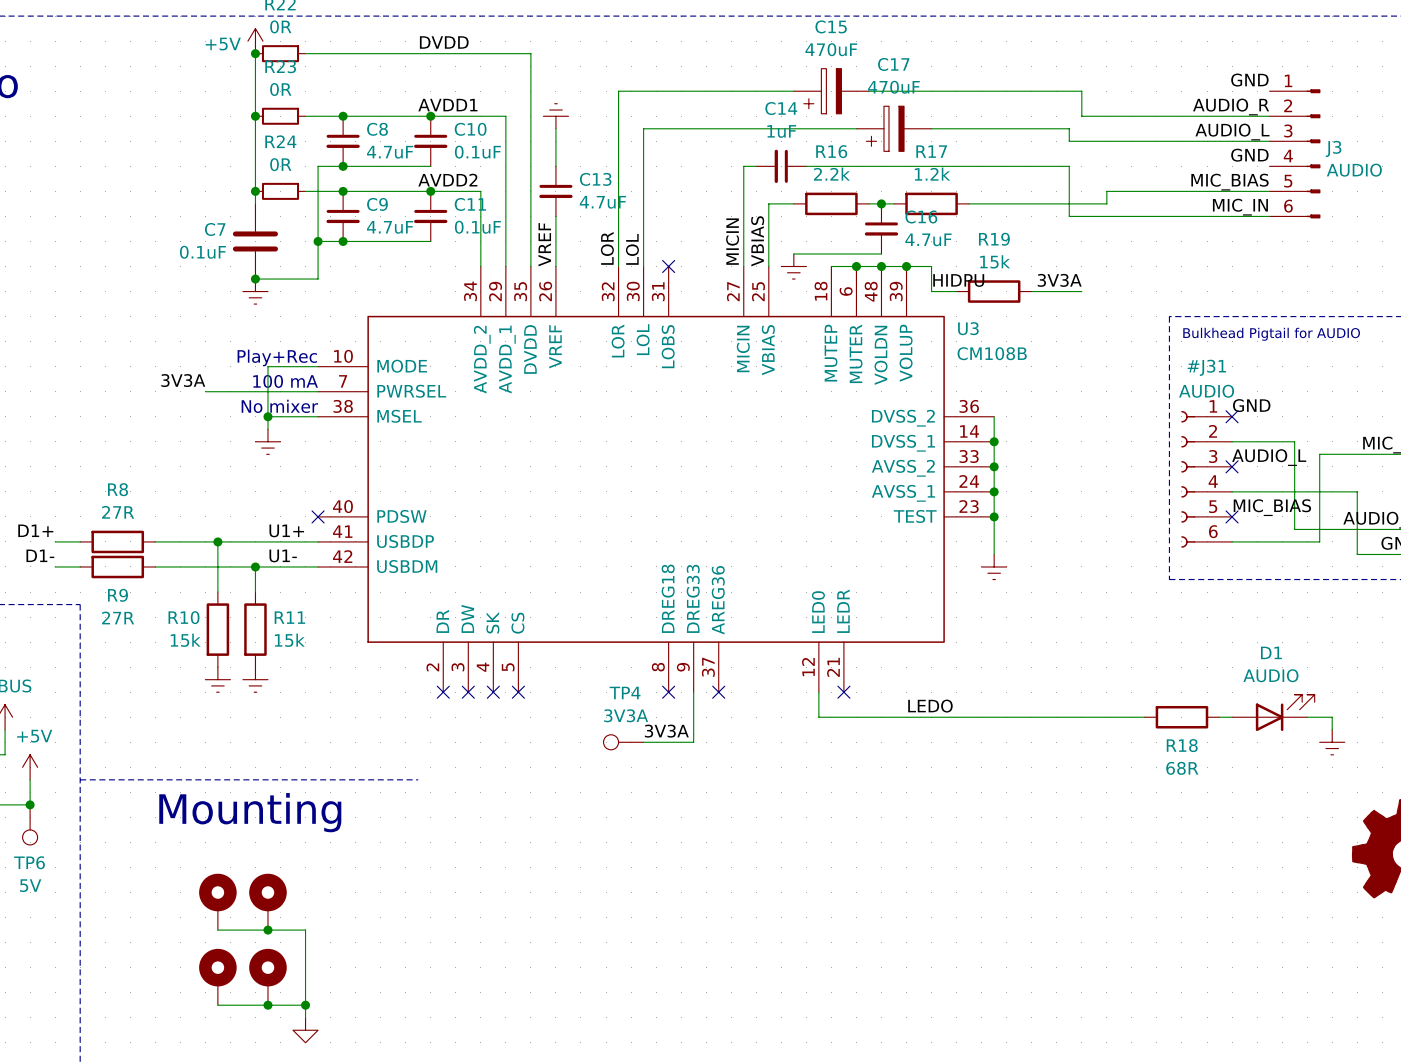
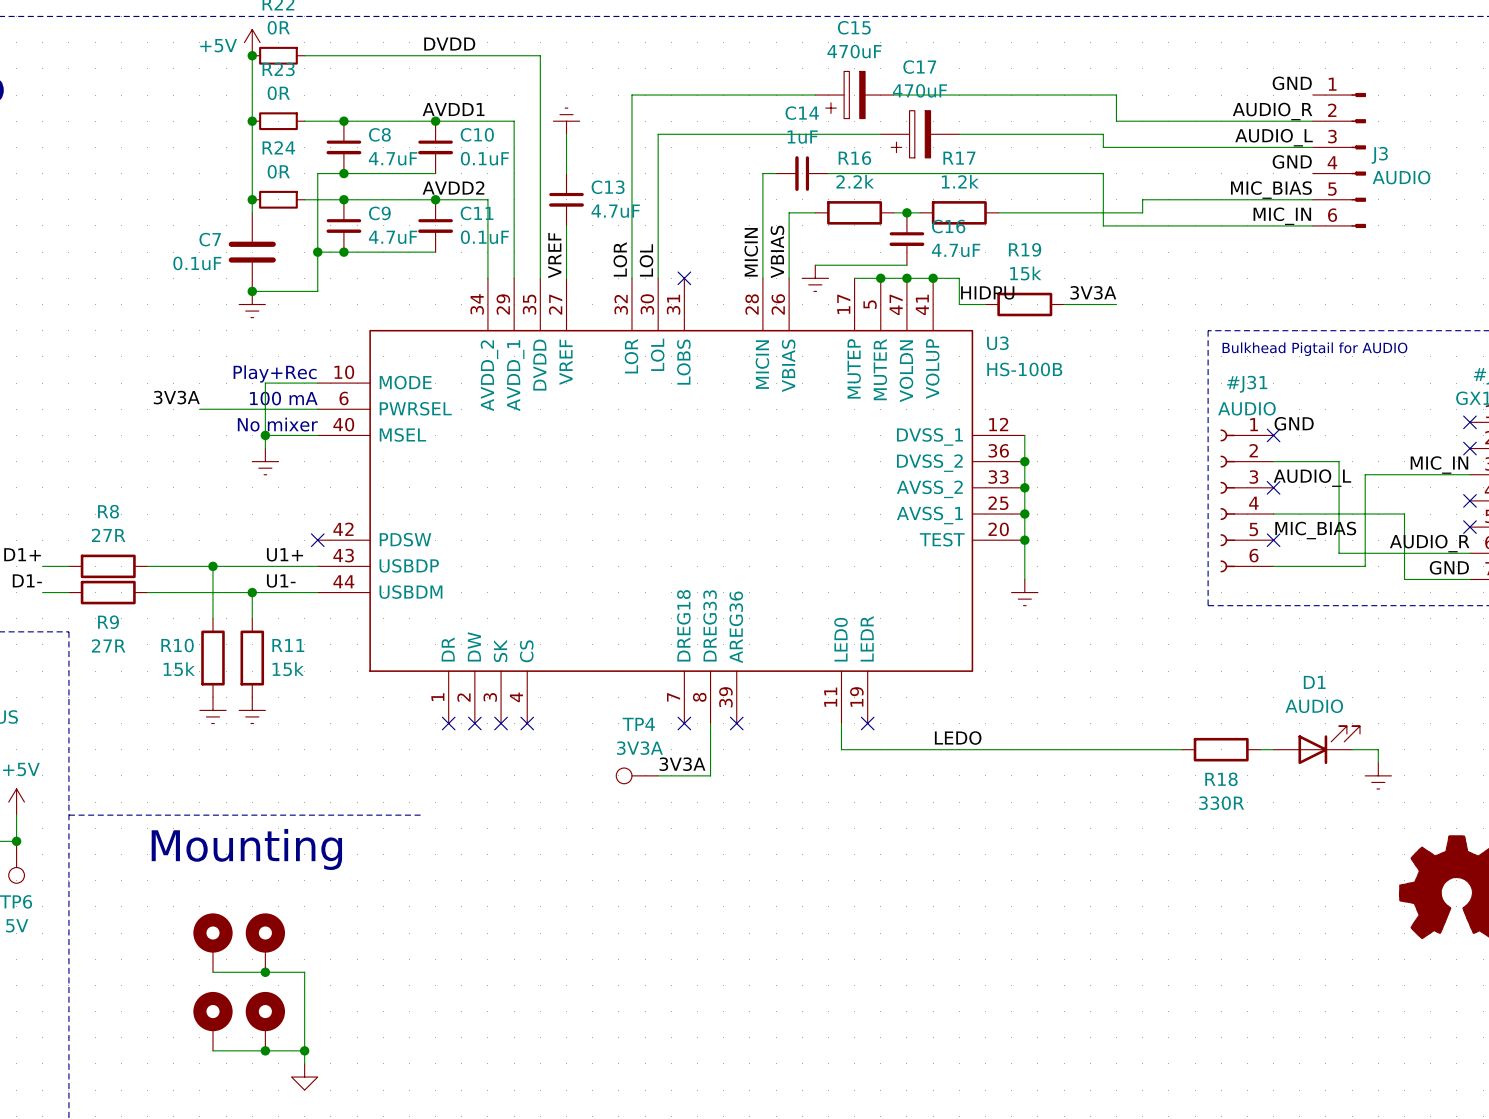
U3 symbol: [318, 266, 995, 693] -> [317, 278, 1025, 724]
U3 value: CM108B (992, 353) -> HS-100B (1024, 369)
R18 value: 68R (1182, 768) -> 330R (1221, 803)

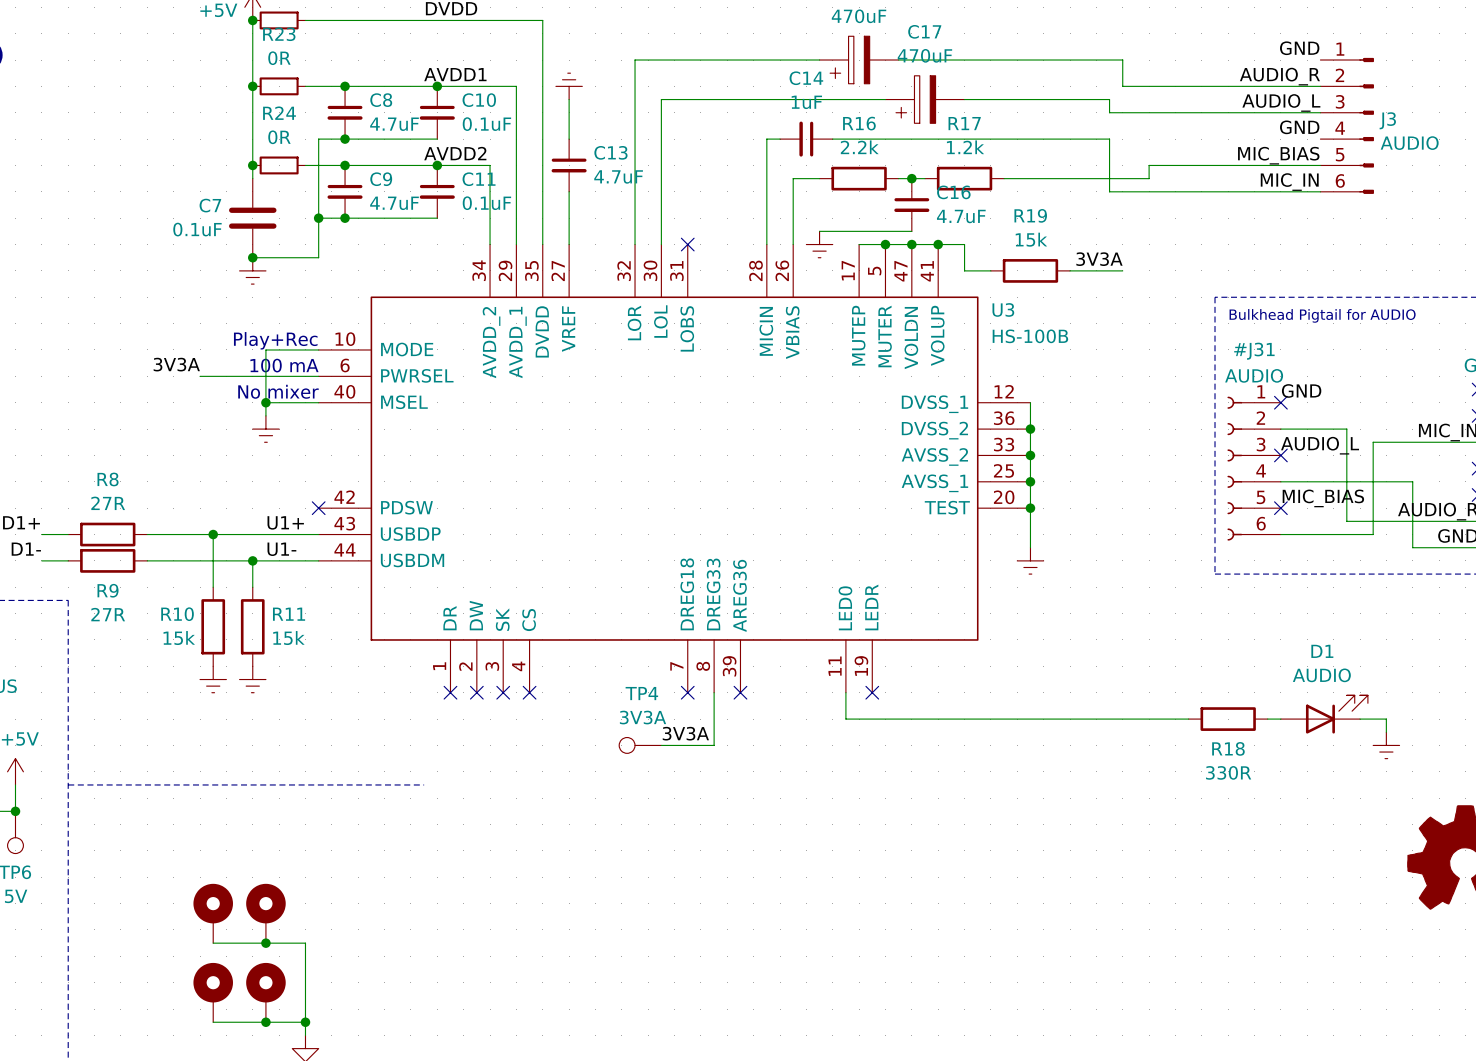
label: VBIAS (777, 251) -> none
label: MICIN (751, 252) -> none
label: VREF (554, 255) -> none
label: LOR (620, 259) -> none
label: LOL (646, 260) -> none
label: HIDPU (987, 292) -> none
label: LEDO (958, 738) -> none
text: Mounting (246, 849) -> none

